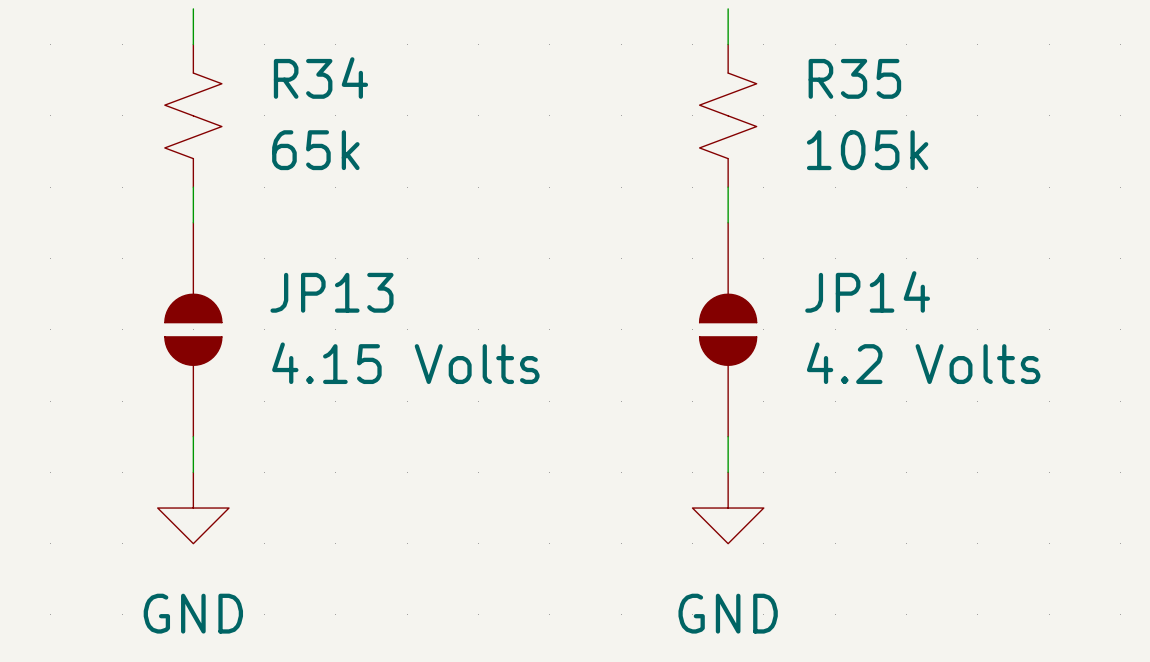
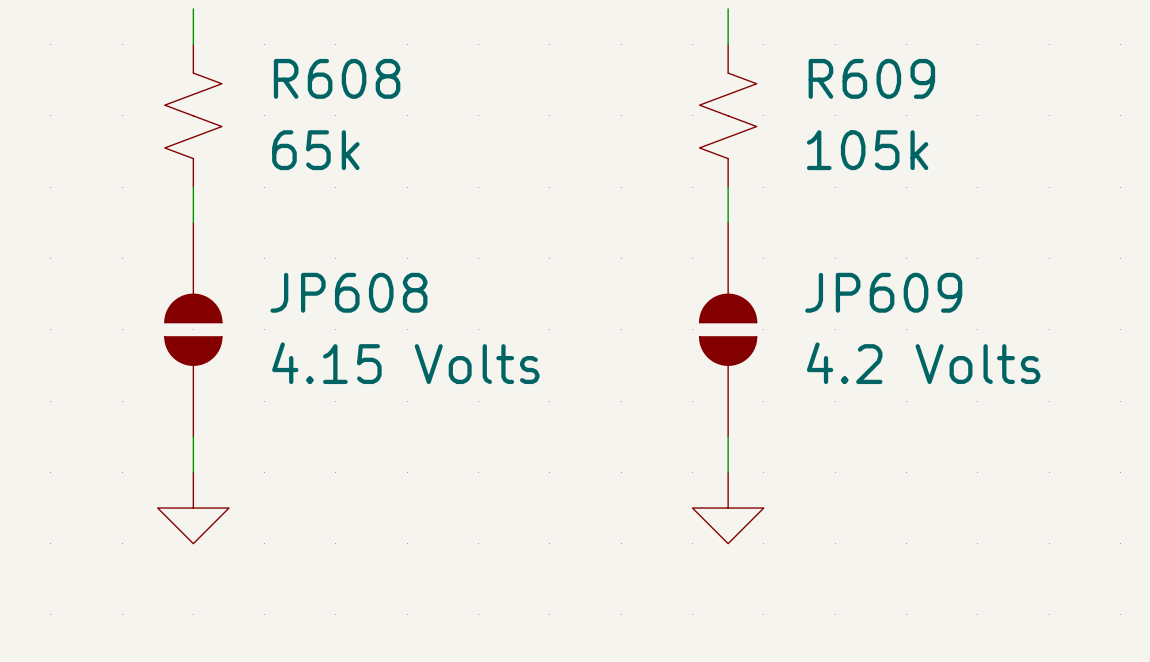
R34 name: R34 (320, 78) -> R608 (337, 78)
R35 name: R35 (854, 78) -> R609 (871, 78)
JP14 name: JP14 (867, 291) -> JP609 (883, 292)
JP13 name: JP13 (331, 292) -> JP608 (348, 292)
power symbol text: GND (193, 613) -> none
power symbol text: GND (728, 613) -> none

